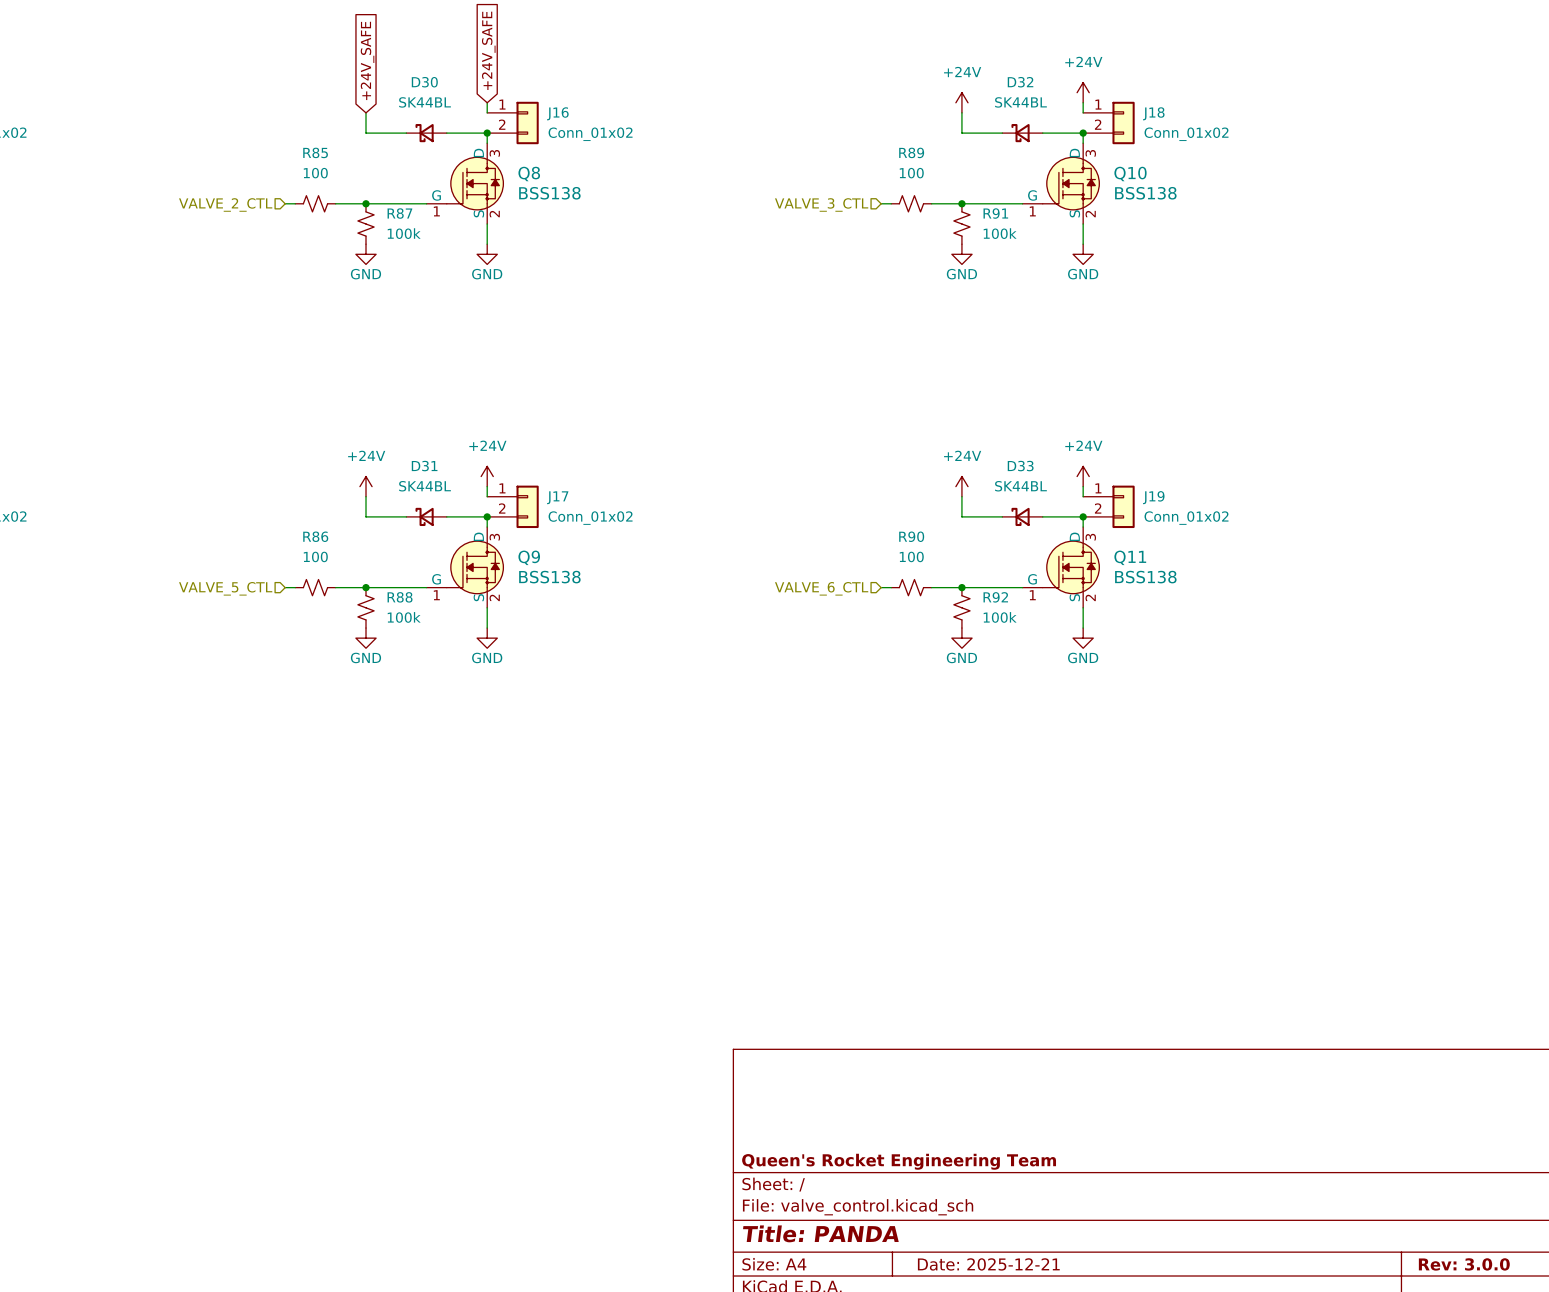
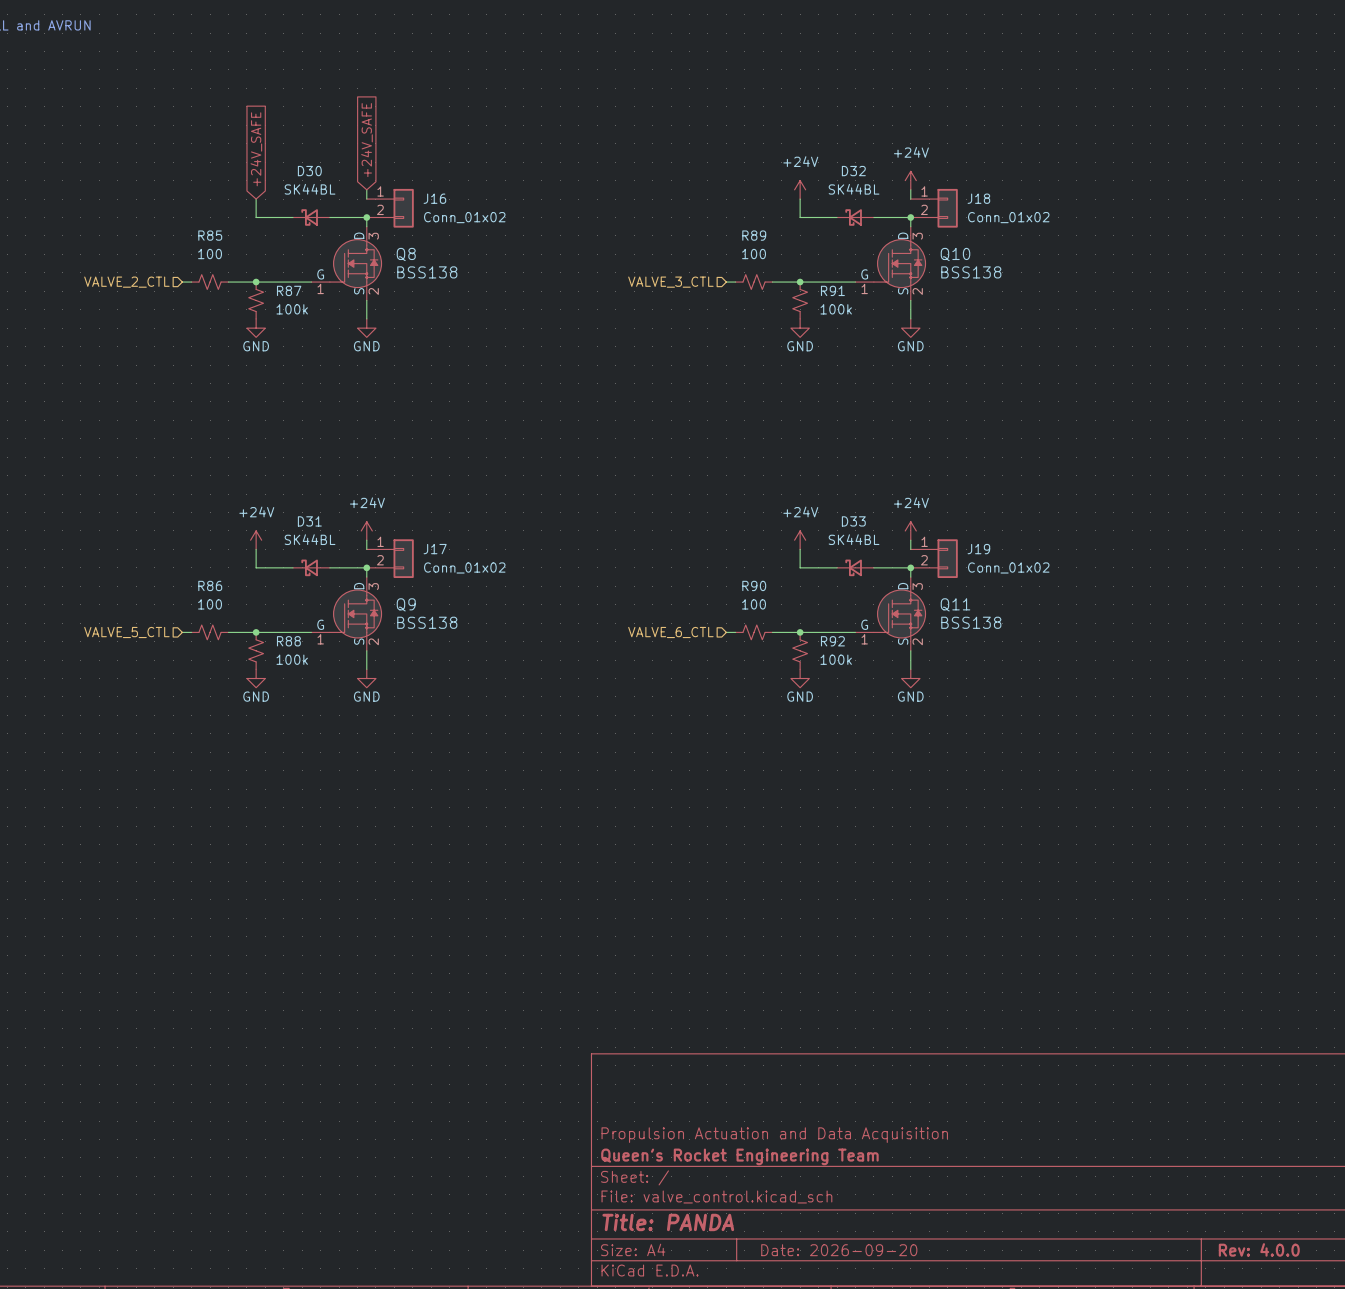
title block: none -> Propulsion Actuation and Data Acquisition (774, 1135)
title block: Date: 2025-12-21 (988, 1264) -> Date: 2026-09-20 (839, 1250)
title block: Rev: 3.0.0 (1464, 1264) -> Rev: 4.0.0 (1259, 1249)

